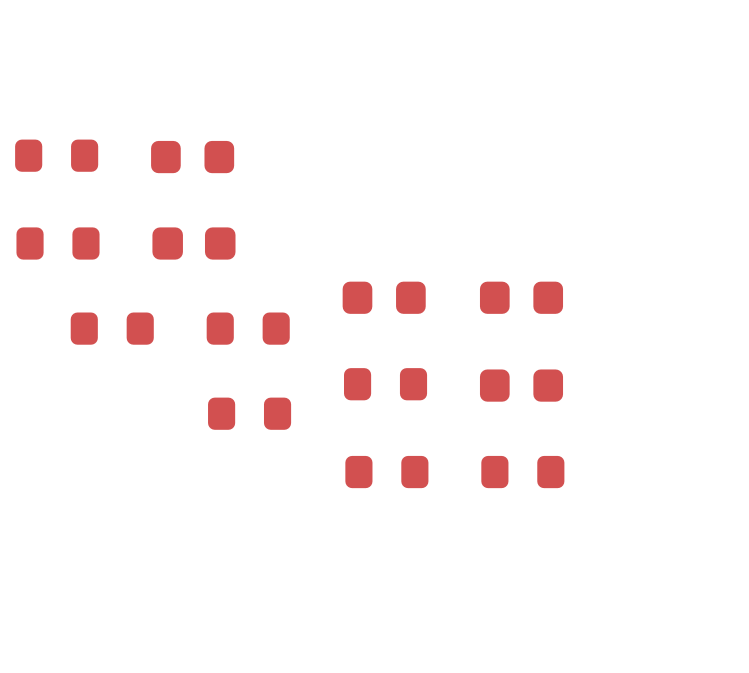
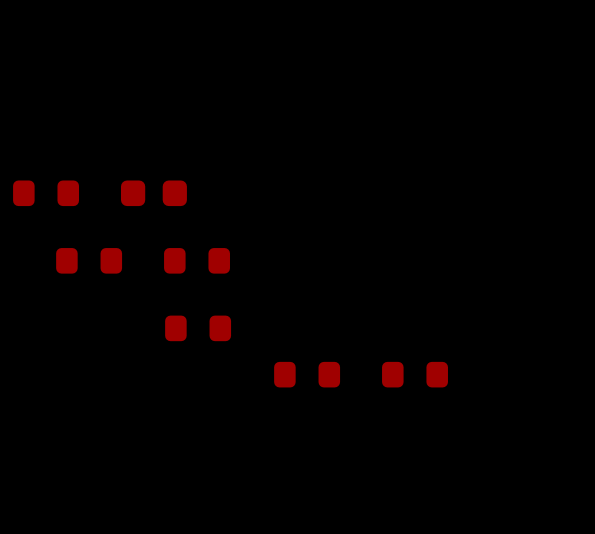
part: (56, 155) -> none
part: (192, 157) -> none
part: (384, 297) -> none
part: (521, 297) -> none
part: (385, 384) -> none
part: (521, 385) -> none

